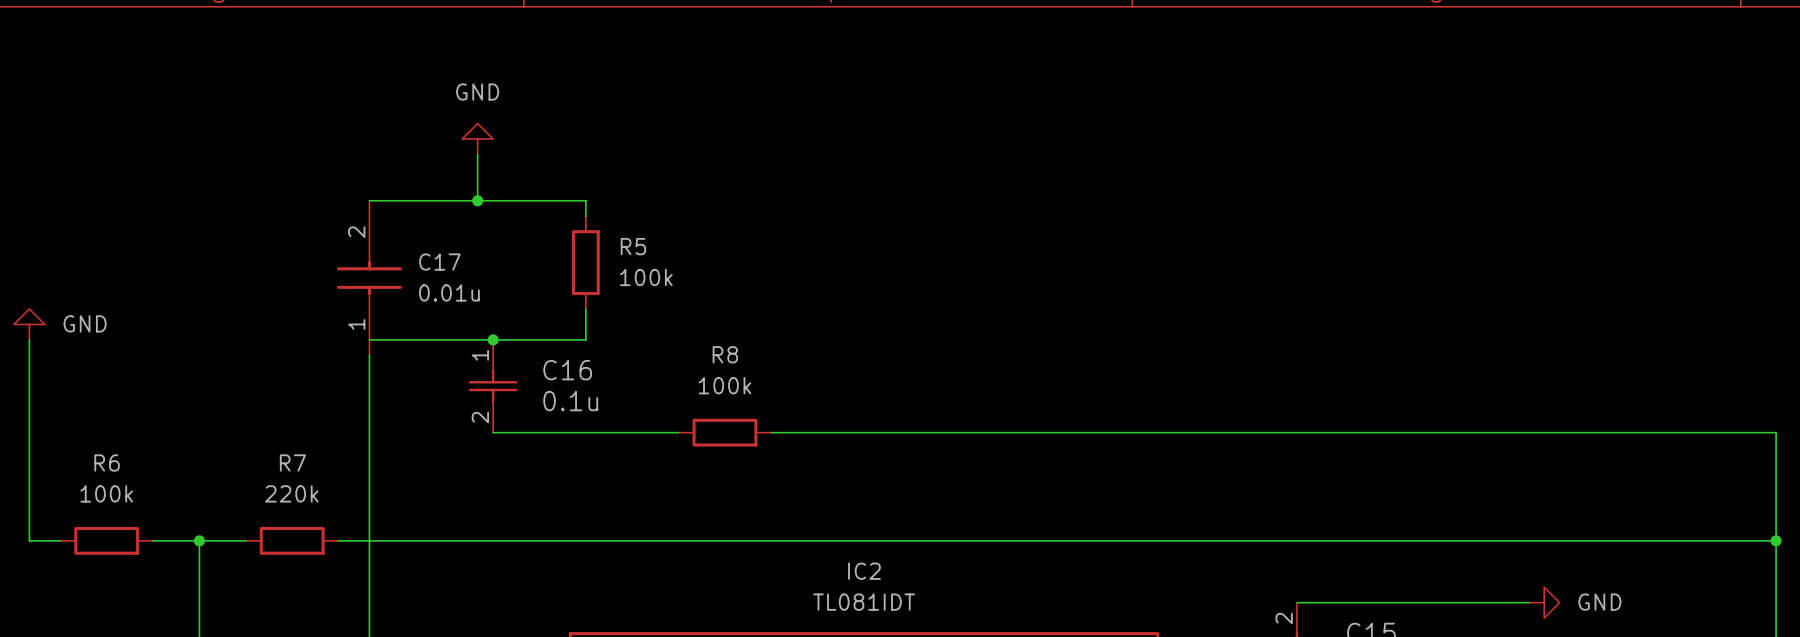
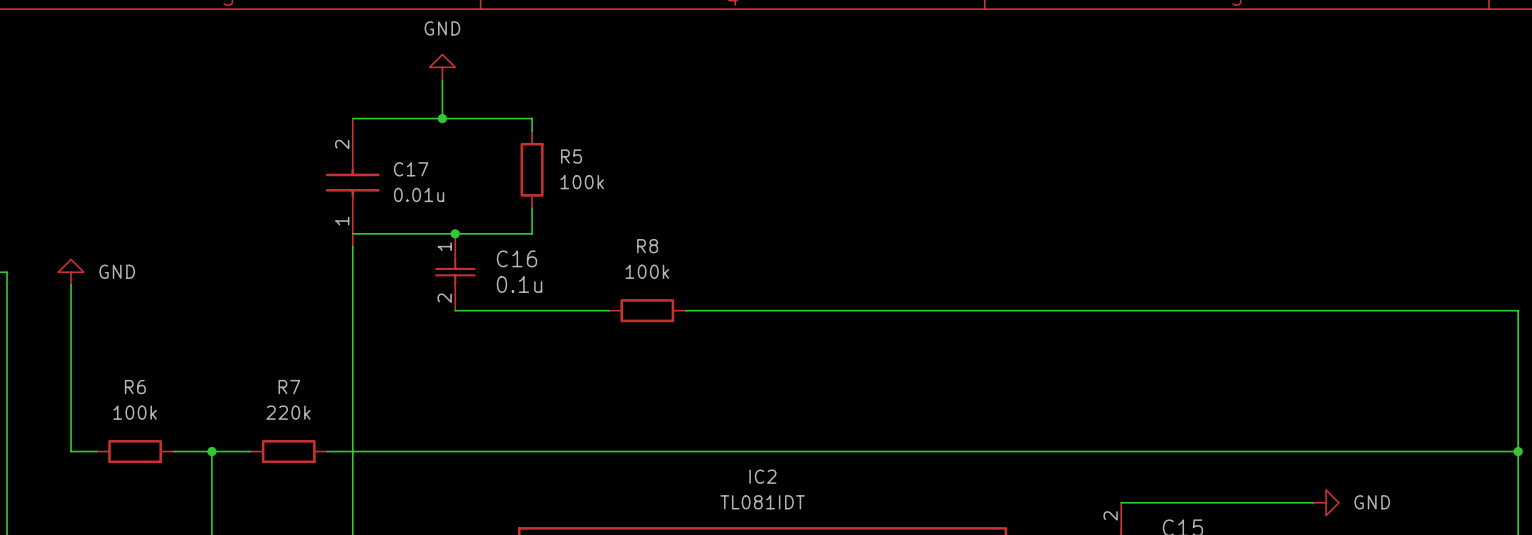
junction: none -> (442, 118)
power symbol position: GND (477, 138) -> GND (442, 67)
wire: (477, 154) (477, 200) -> (442, 80) (442, 118)
wire: (369, 200) (585, 200) (585, 216) -> (352, 118) (532, 118) (532, 131)
junction: (477, 200) -> none
R5 position: (585, 262) -> (532, 169)
C17 position: (369, 278) -> (352, 182)
junction: none -> (455, 233)
wire: (585, 309) (585, 339) (369, 339) -> (532, 208) (532, 233) (352, 233)
junction: (493, 339) -> none
C16 position: (493, 386) -> (455, 272)
wire: (493, 432) (678, 432) -> (455, 310) (608, 310)
R8 position: (724, 432) -> (647, 310)
wire: (771, 432) (1776, 432) -> (685, 310) (1518, 310) (1518, 361)

